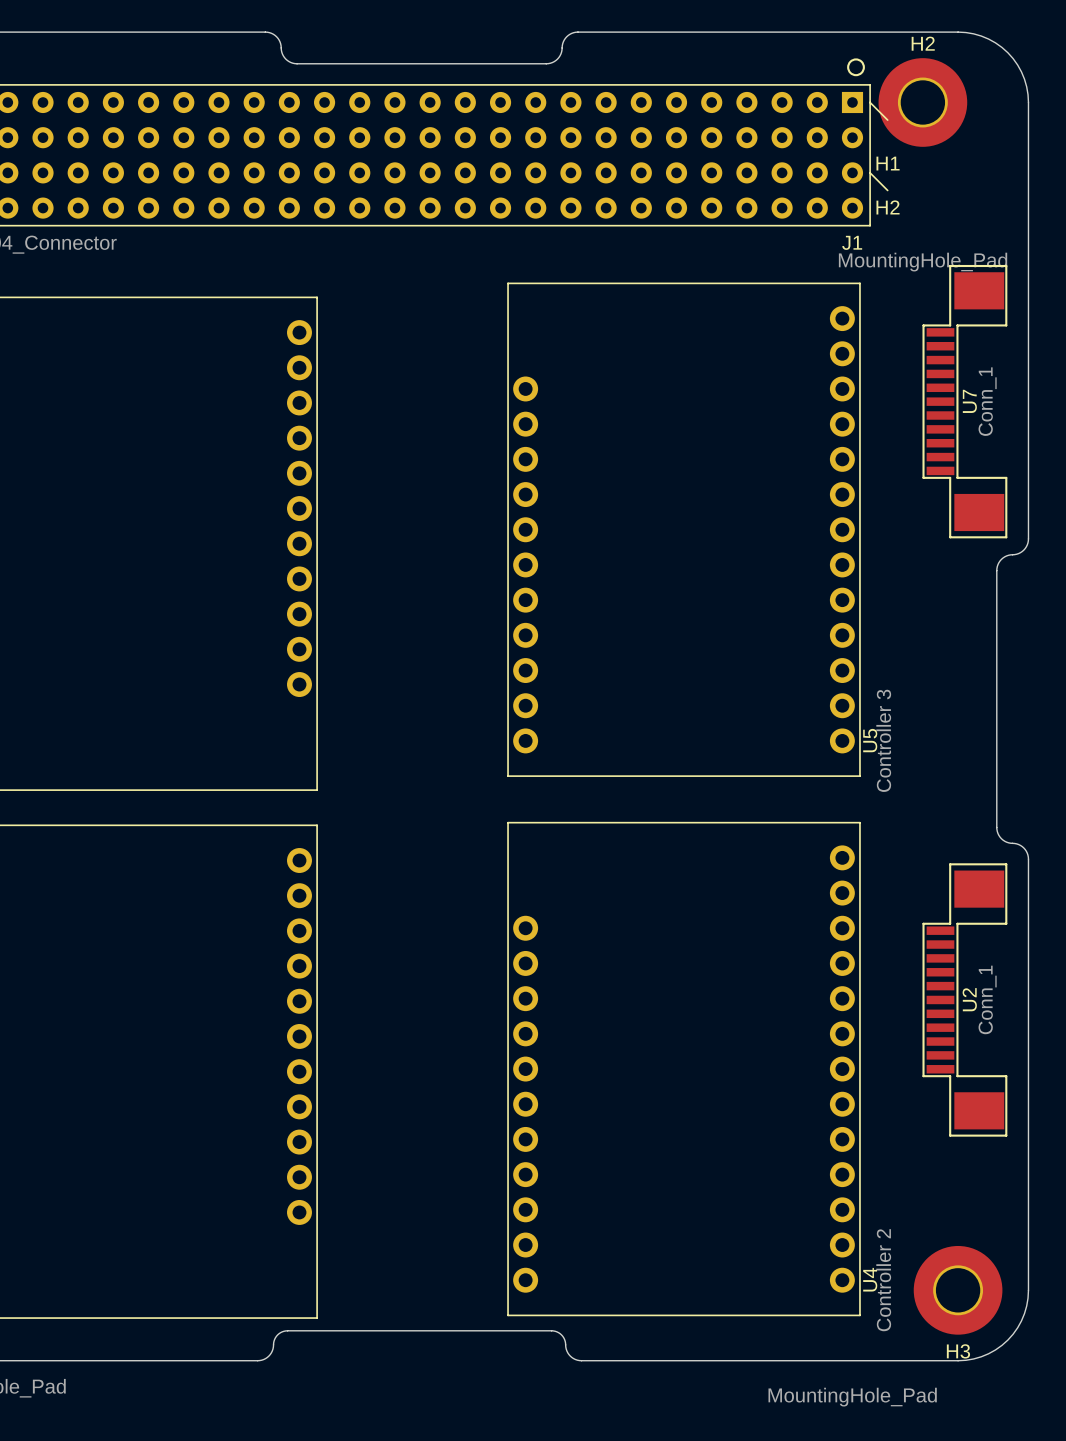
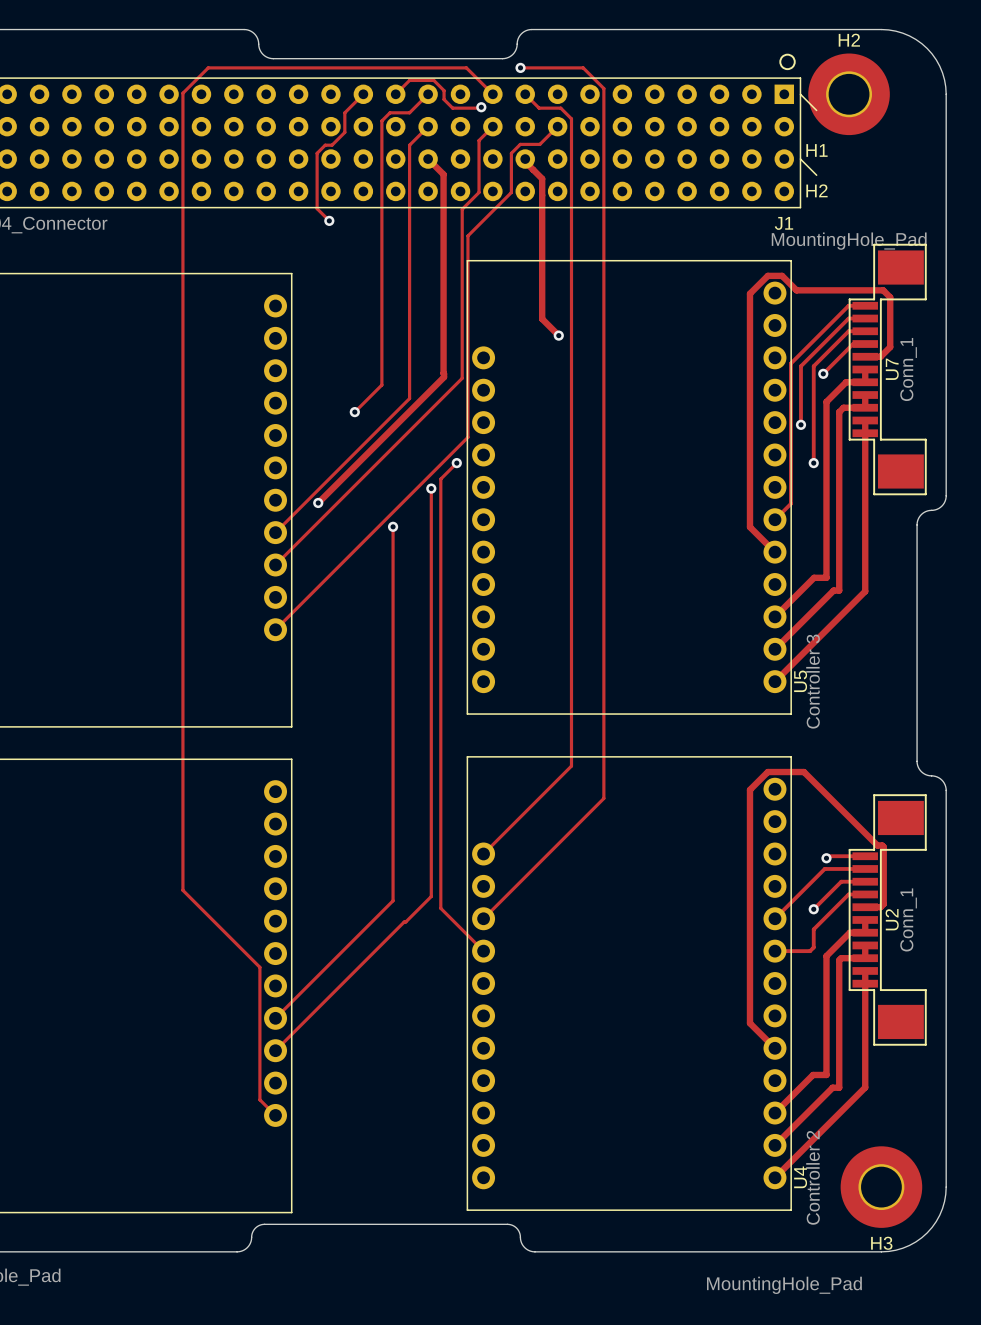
track: none -> (520, 67) (583, 67) (603, 88) (603, 798) (483, 918)
via: none -> (520, 67)
track: none -> (363, 94) (344, 112) (344, 132) (332, 145) (325, 145) (317, 153) (317, 208) (329, 220)
track: none -> (395, 94) (409, 80) (433, 80) (444, 90) (444, 99) (452, 108) (481, 107)
track: none -> (428, 94) (409, 112) (390, 112) (381, 120) (381, 385) (354, 412)
track: none -> (492, 94) (466, 67) (208, 67) (182, 93) (182, 890) (259, 967) (259, 1099) (275, 1115)
track: none -> (525, 94) (539, 108) (560, 108) (571, 118) (571, 766) (483, 853)
via: none -> (481, 107)
track: none -> (428, 126) (409, 145) (409, 398) (275, 532)
track: none -> (492, 126) (479, 140) (479, 192) (462, 209) (462, 378) (275, 565)
track: none -> (557, 126) (539, 144) (520, 144) (511, 153) (511, 192) (467, 235) (467, 437) (275, 629)
track: none -> (428, 159) (443, 174) (444, 377) (318, 502)
track: none -> (525, 159) (525, 161) (542, 178) (542, 319) (558, 335)
via: none -> (329, 220)
track: none -> (865, 305) (848, 305) (790, 363) (790, 503) (774, 519)
track: none -> (865, 318) (848, 318) (800, 366) (800, 424)
track: none -> (865, 331) (848, 331) (813, 366) (813, 463)
via: none -> (558, 335)
track: none -> (865, 344) (853, 344) (823, 373)
track: none -> (865, 356) (880, 356) (890, 347) (890, 297) (883, 290) (796, 290) (782, 275) (767, 275) (750, 293) (750, 527) (774, 552)
track: none -> (865, 369) (865, 382) (846, 382) (826, 401) (826, 577) (814, 577) (774, 616)
via: none -> (823, 373)
track: none -> (865, 395) (865, 407) (843, 407) (839, 412) (839, 590) (833, 590) (774, 649)
via: none -> (354, 412)
track: none -> (865, 420) (865, 591) (774, 681)
via: none -> (800, 424)
track: none -> (456, 463) (440, 479) (440, 908) (483, 951)
via: none -> (456, 463)
via: none -> (813, 463)
track: none -> (431, 488) (431, 896) (275, 1050)
via: none -> (431, 488)
via: none -> (318, 502)
track: none -> (393, 526) (393, 900) (275, 1018)
via: none -> (393, 526)
track: none -> (865, 856) (828, 856) (826, 858)
via: none -> (826, 858)
track: none -> (865, 868) (824, 868) (774, 918)
track: none -> (865, 881) (841, 881) (813, 909)
track: none -> (865, 894) (848, 894) (813, 929) (813, 947) (810, 951) (774, 951)
track: none -> (865, 907) (880, 907) (883, 904) (883, 847) (877, 845) (803, 772) (767, 772) (750, 789) (750, 1023) (774, 1048)
via: none -> (813, 909)
track: none -> (865, 919) (865, 932) (849, 932) (826, 956) (826, 1074) (813, 1074) (774, 1113)
track: none -> (865, 945) (865, 958) (841, 958) (839, 960) (839, 1087) (832, 1087) (774, 1145)
track: none -> (865, 970) (865, 1087) (774, 1177)

